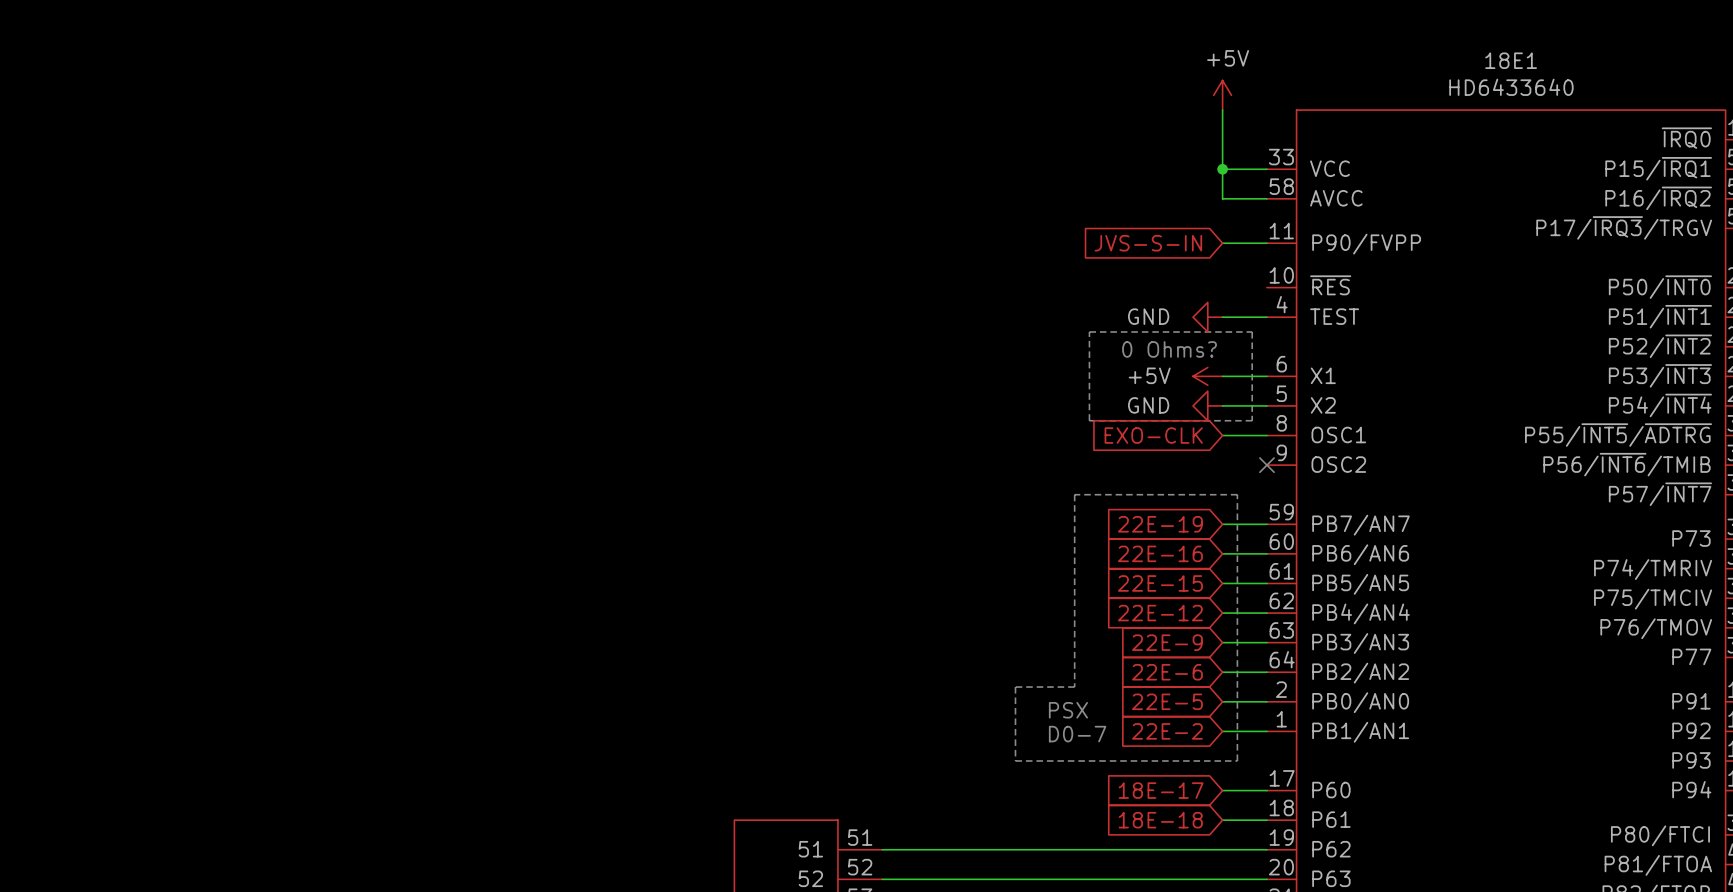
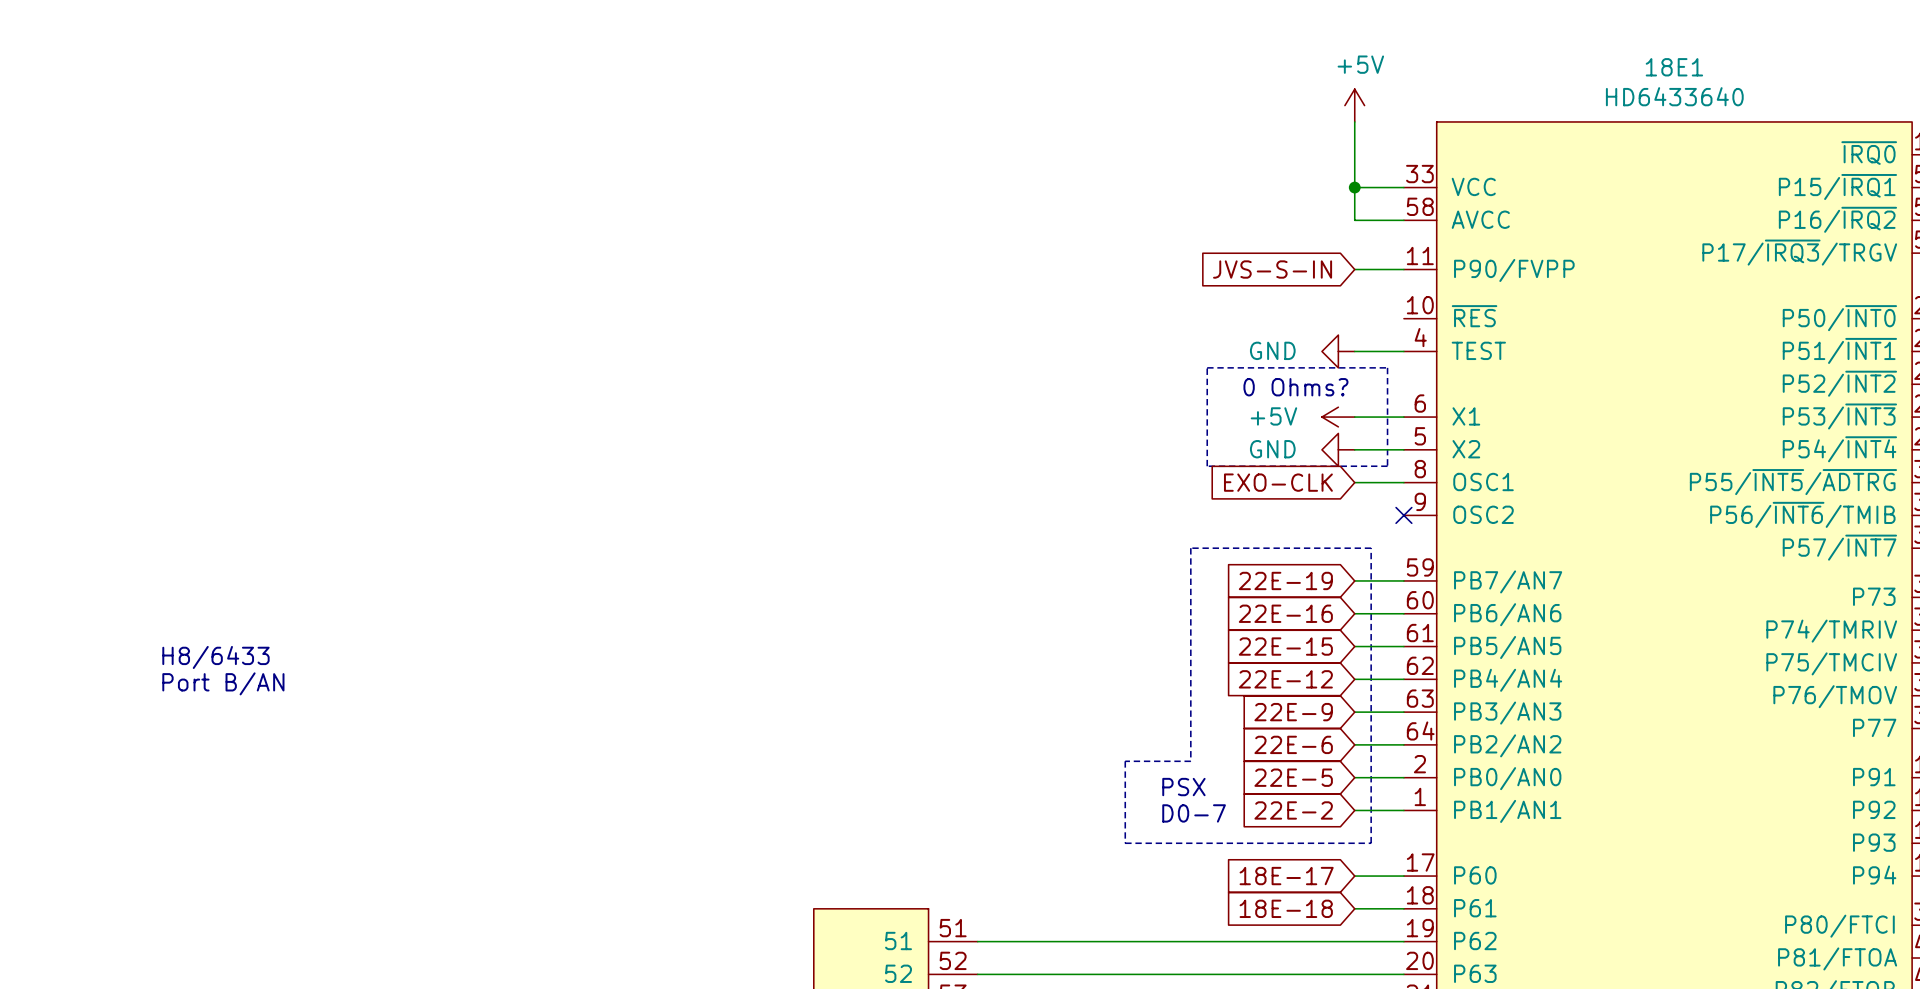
text: none -> H8/6433 (215, 657)
text: none -> Port B/AN (223, 683)

